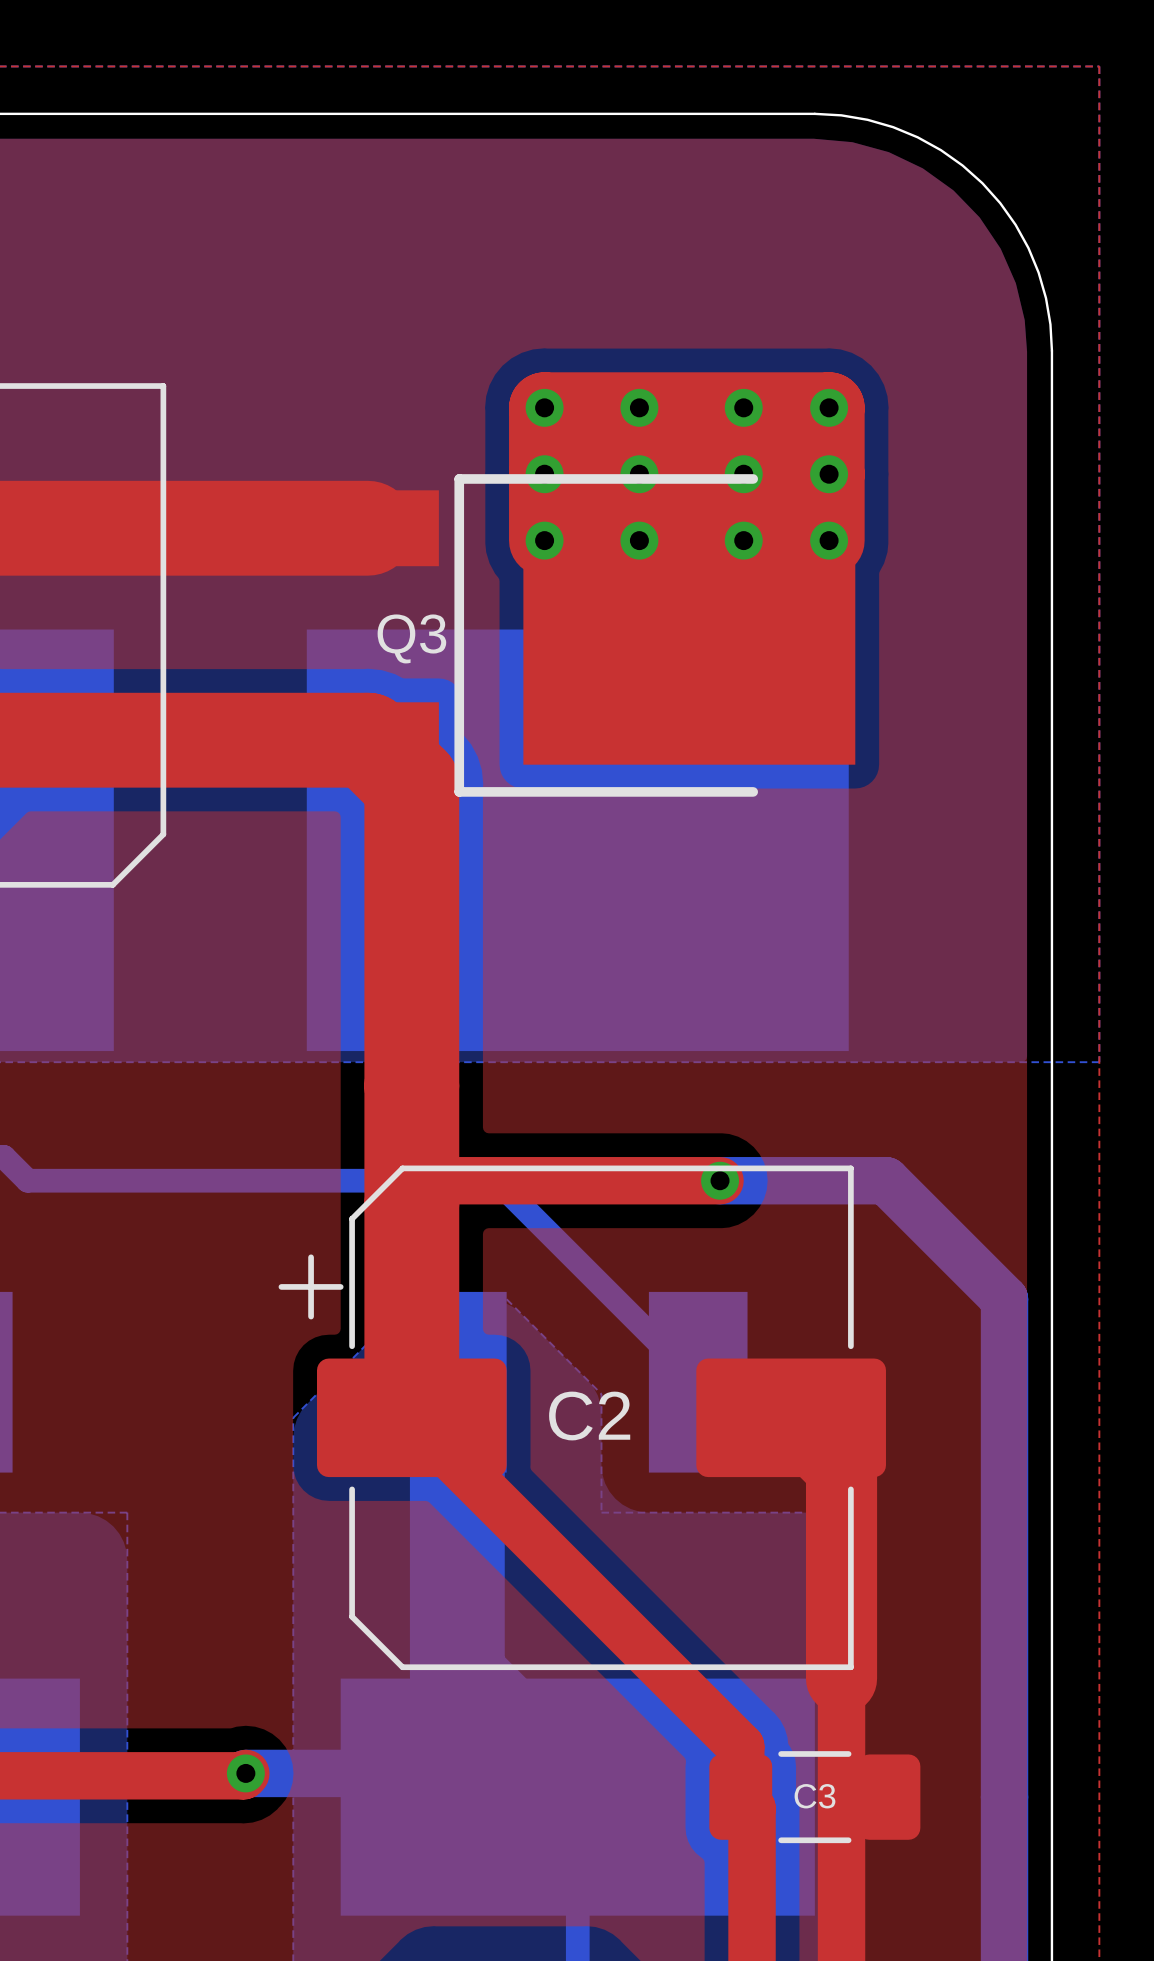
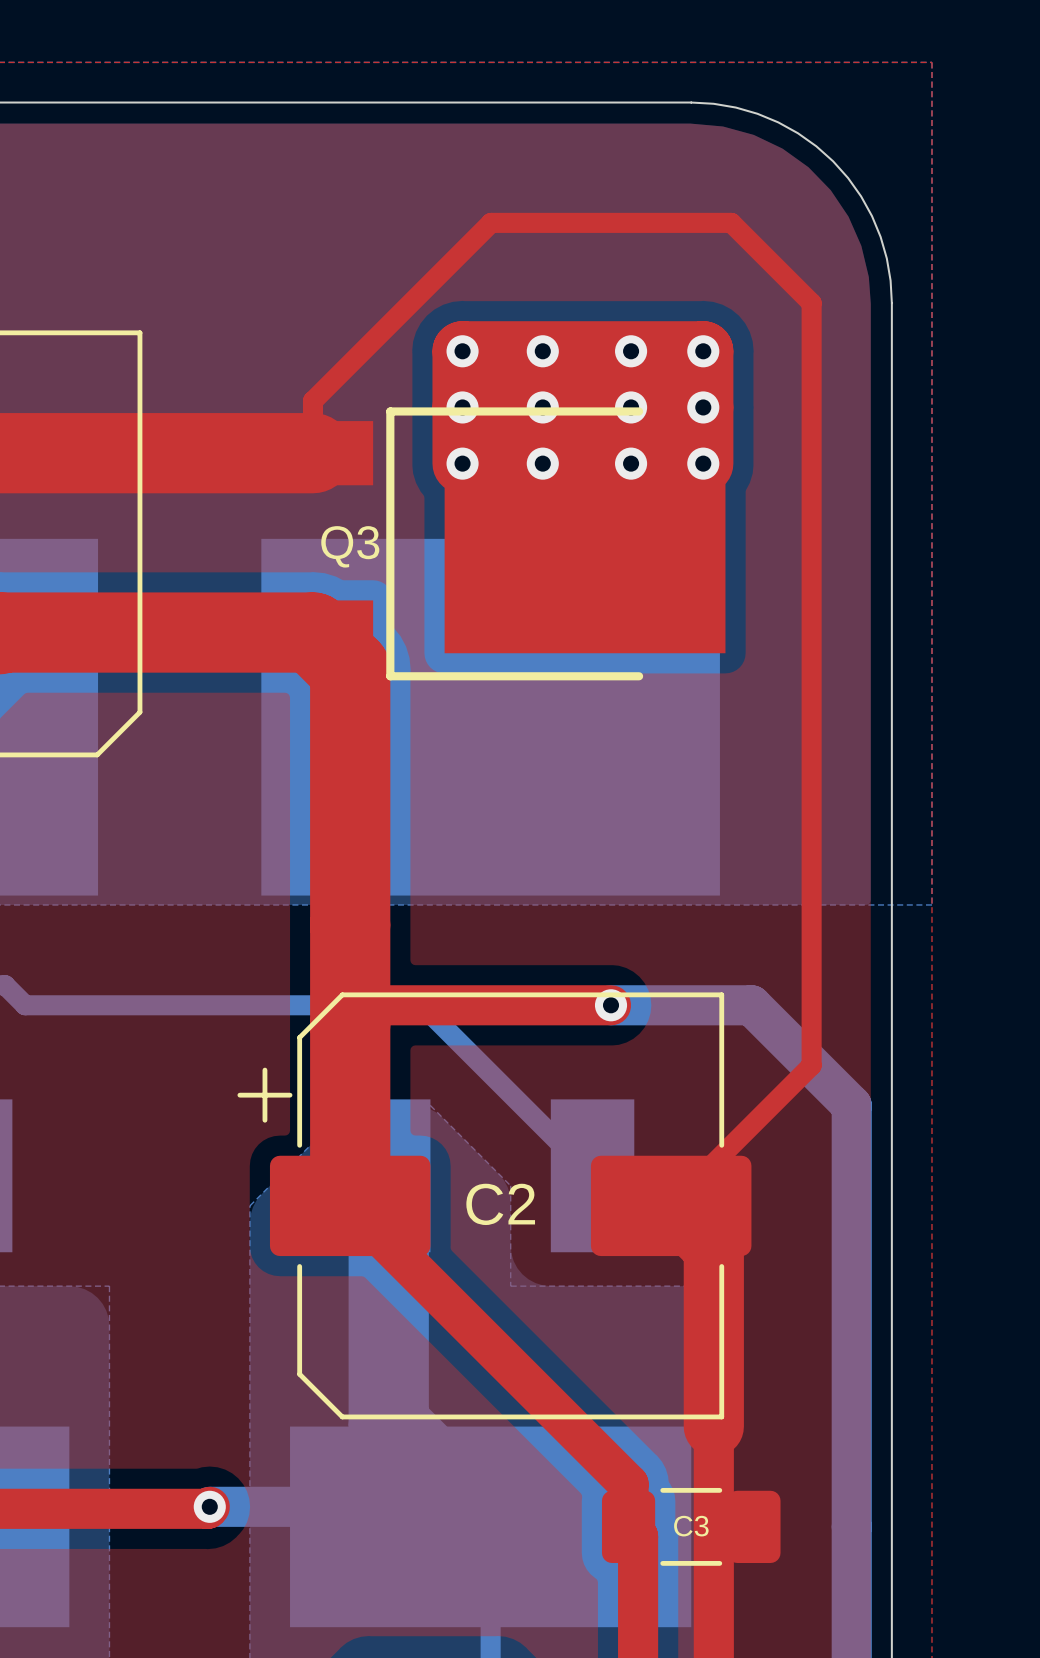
top track: none -> (312, 453) (312, 401) (491, 222) (731, 222) (811, 303) (811, 1065) (671, 1205)

